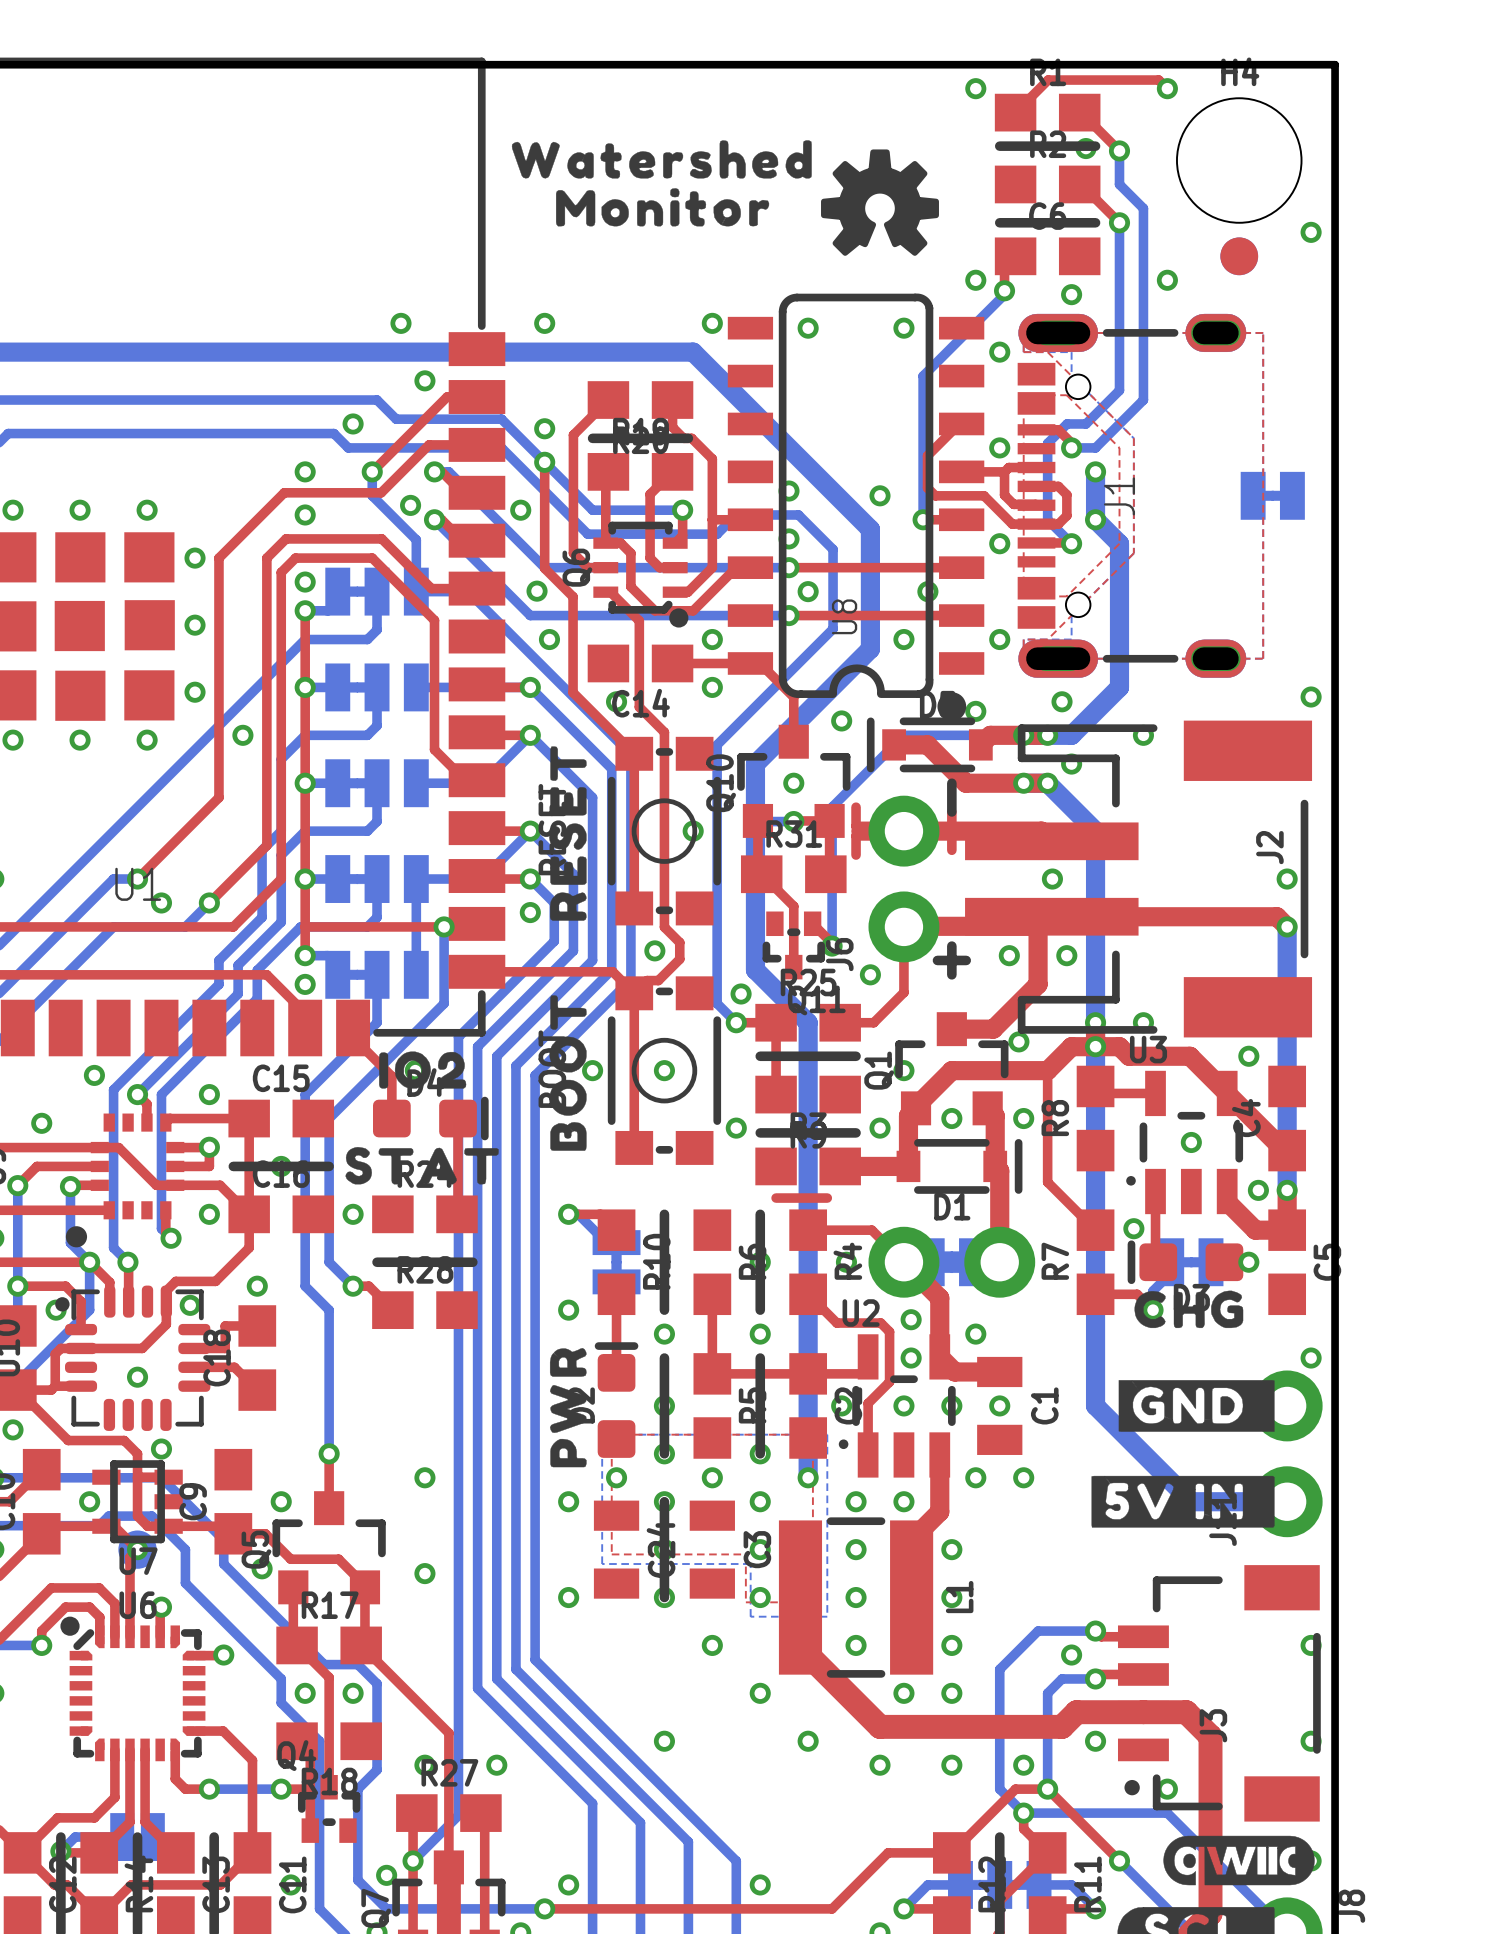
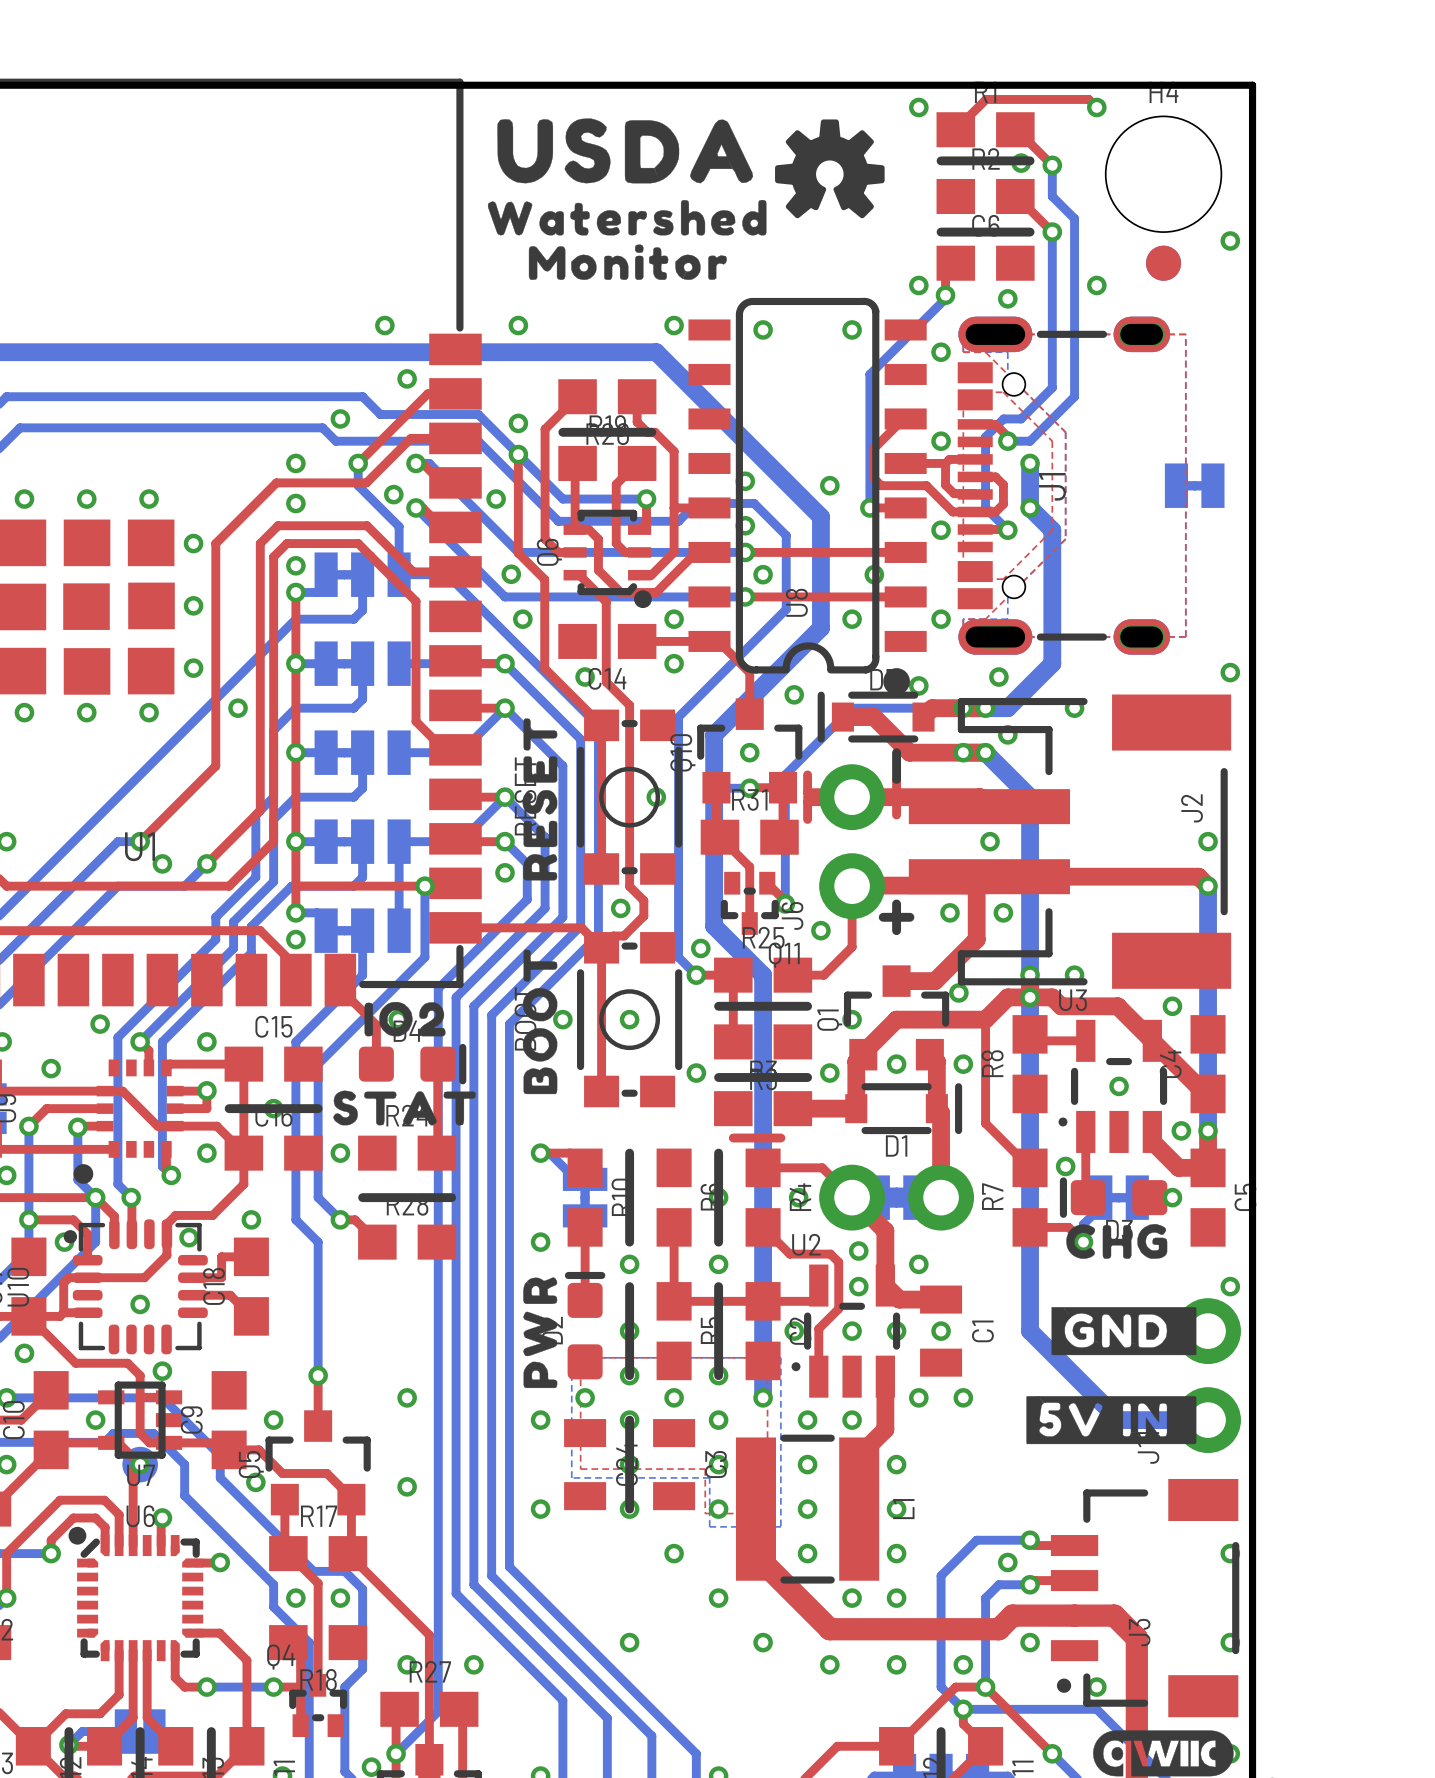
drawing: none -> [497, 118, 754, 184]
drawing position: (661, 159) -> (627, 217)
drawing position: (879, 202) -> (829, 168)
drawing position: (662, 207) -> (627, 262)

